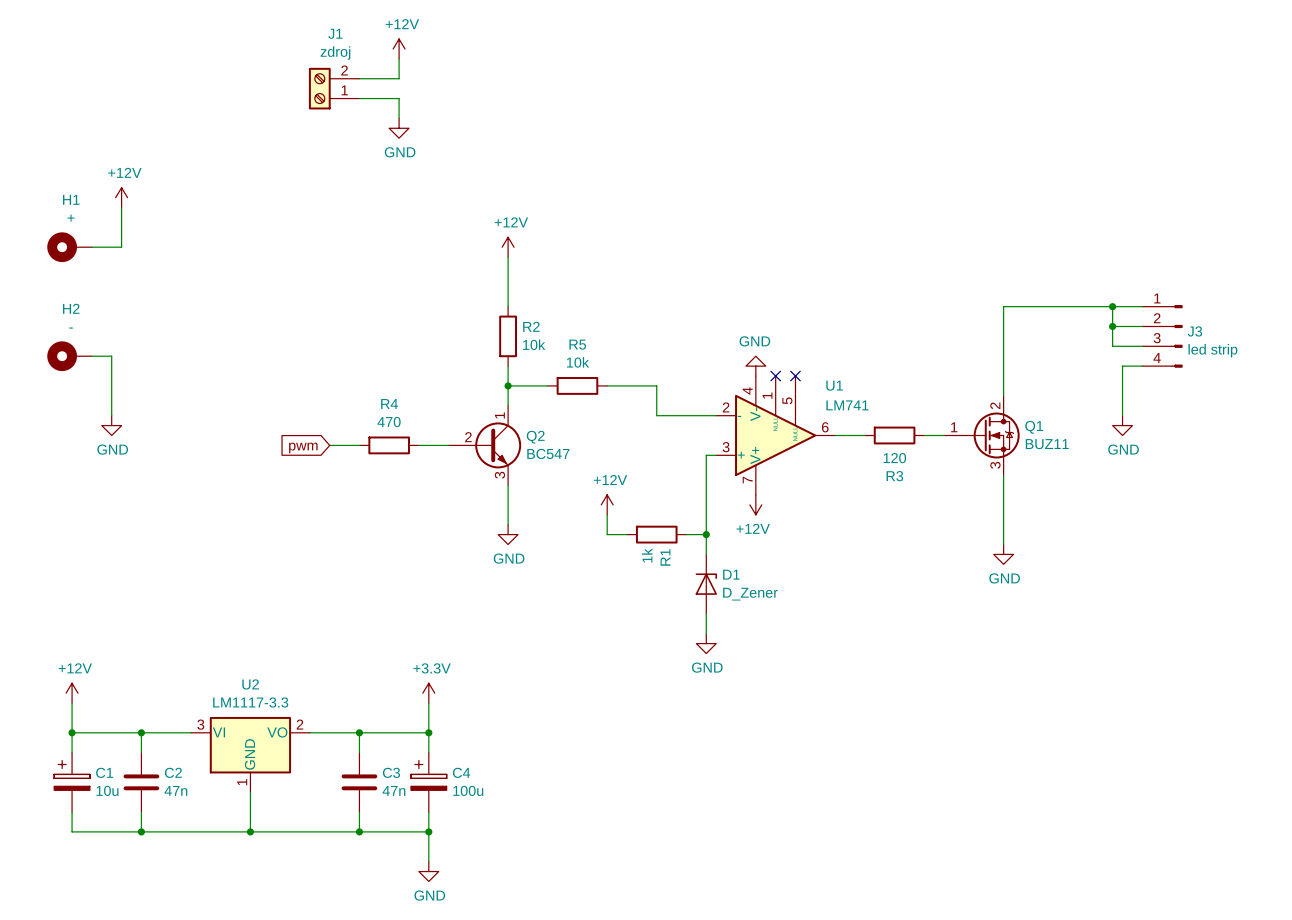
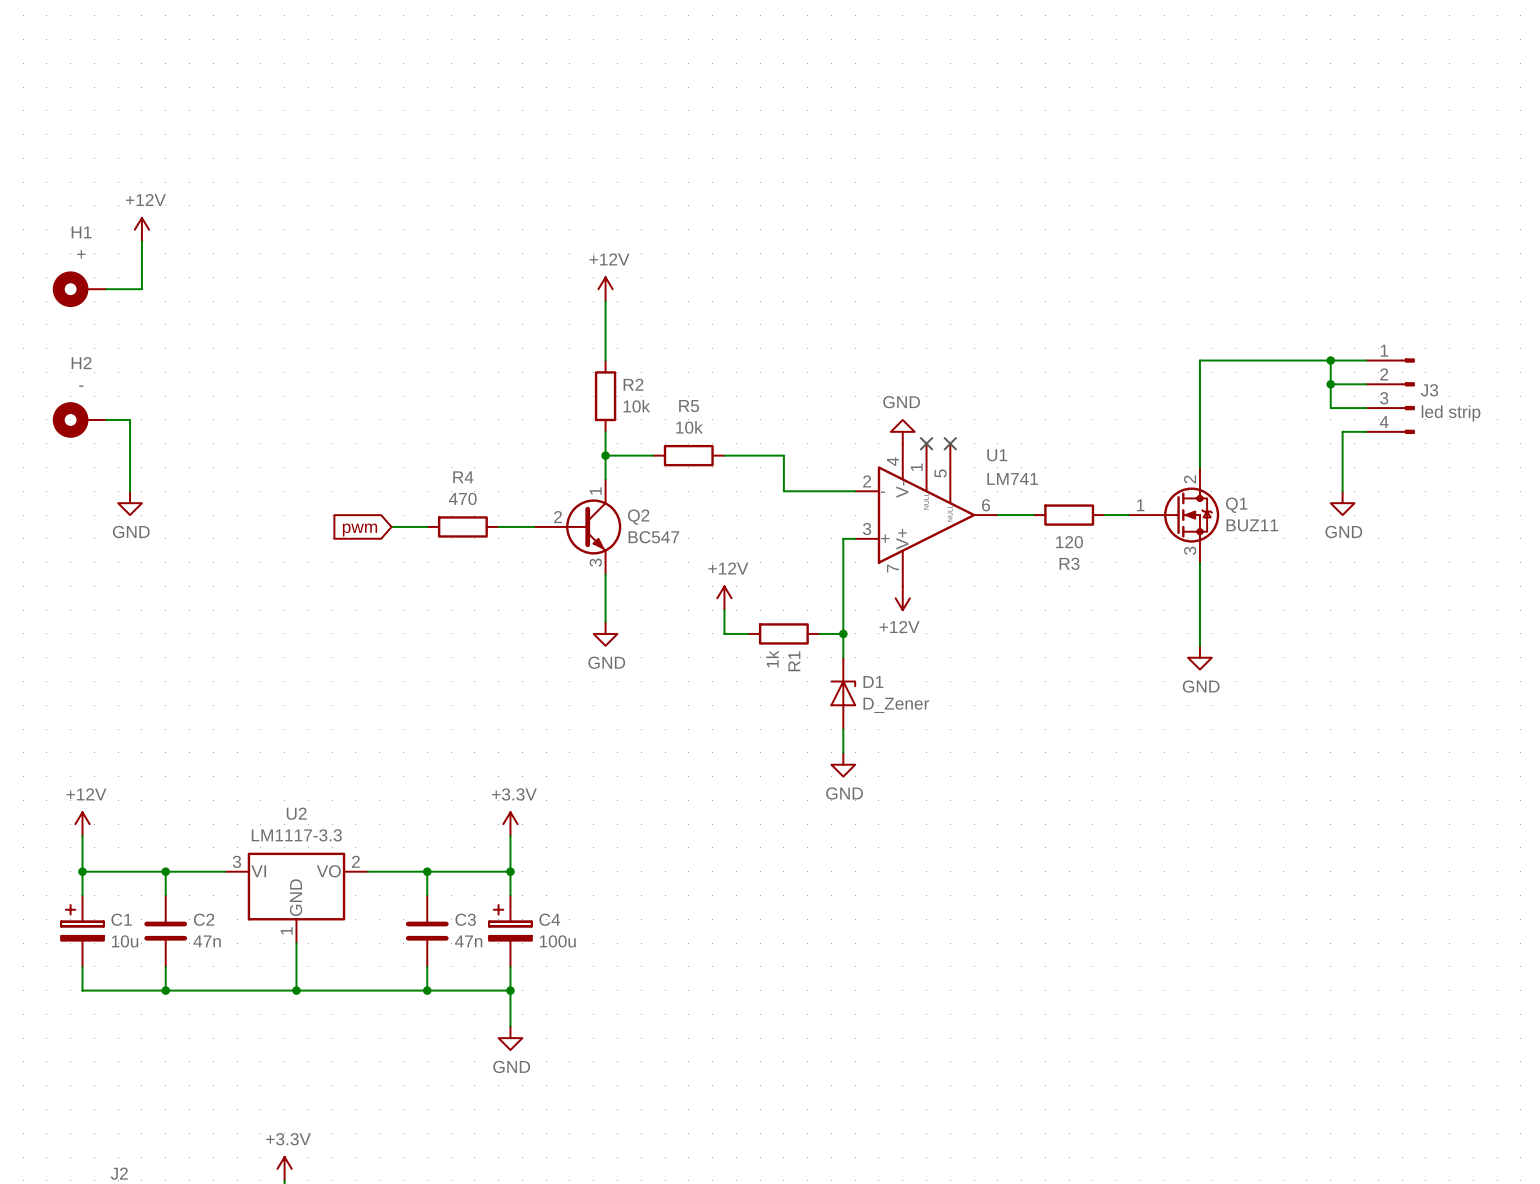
power symbol: +12V (399, 49) -> none
wire: (399, 58) (399, 78) (359, 78) -> none
J1: zdroj (334, 88) -> none
wire: (359, 98) (399, 98) (399, 118) -> none
power symbol: GND (399, 128) -> none

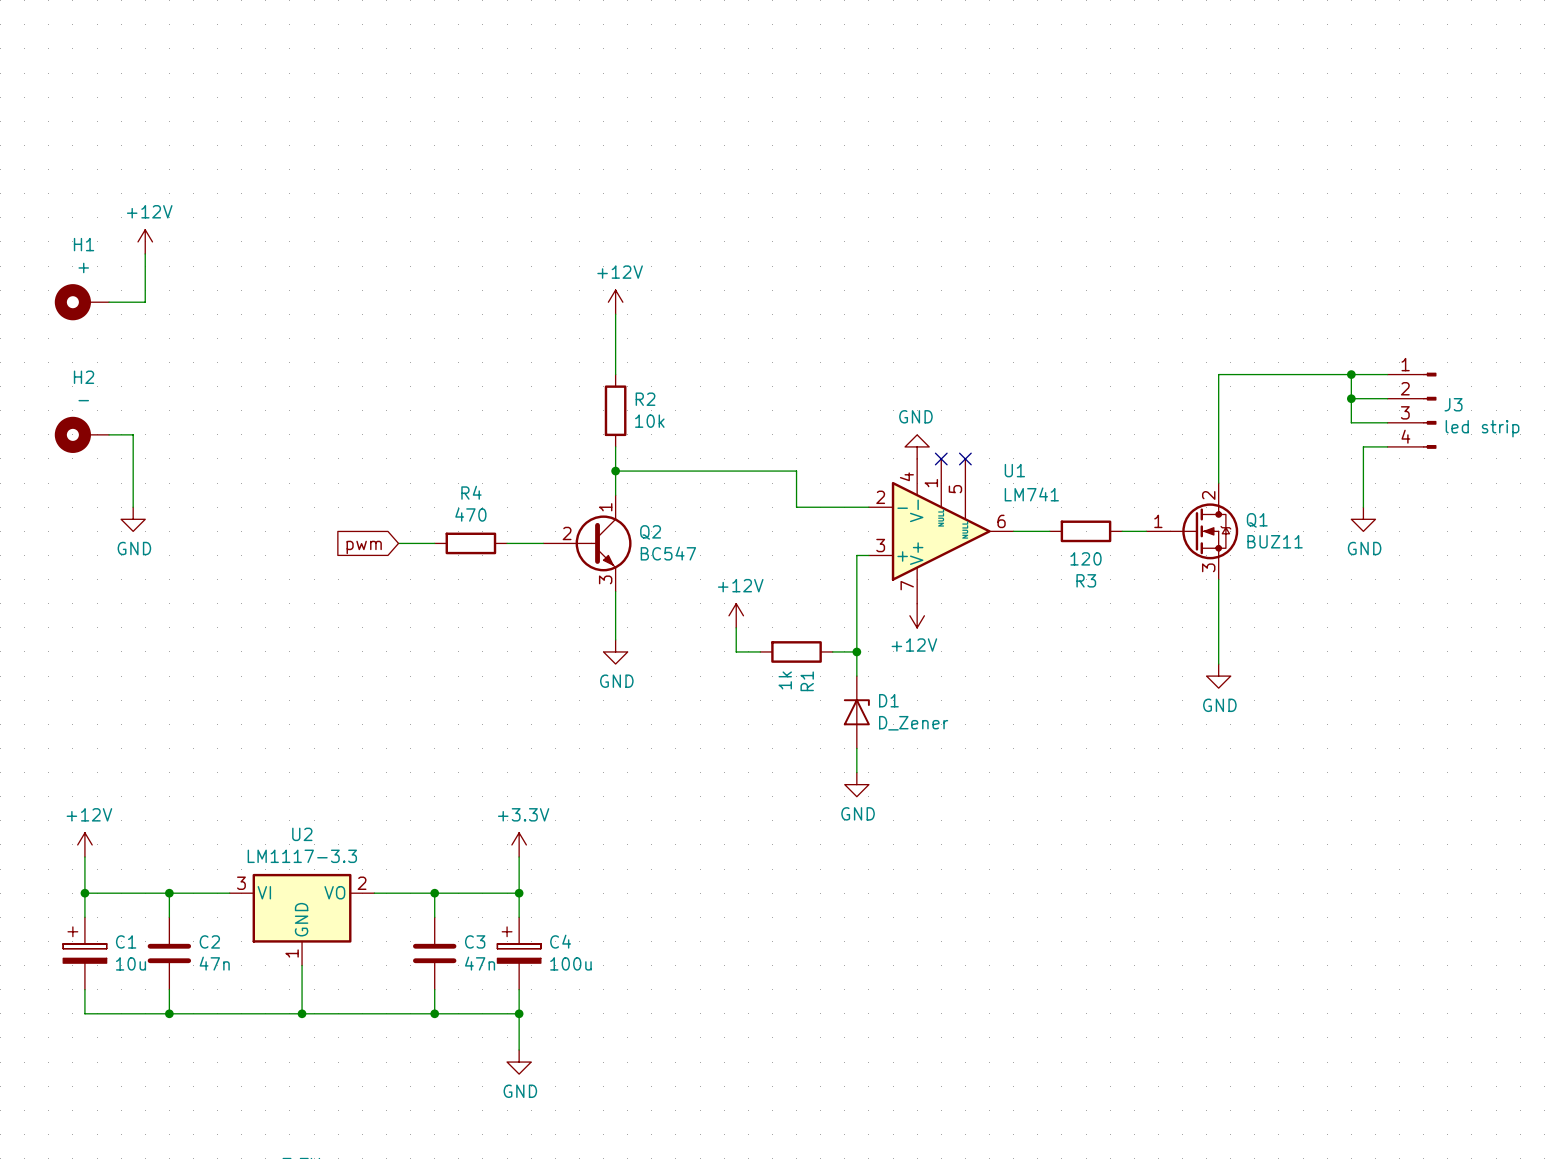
wire: none -> (663, 471) (736, 471)
R5: 10k (688, 455) -> none

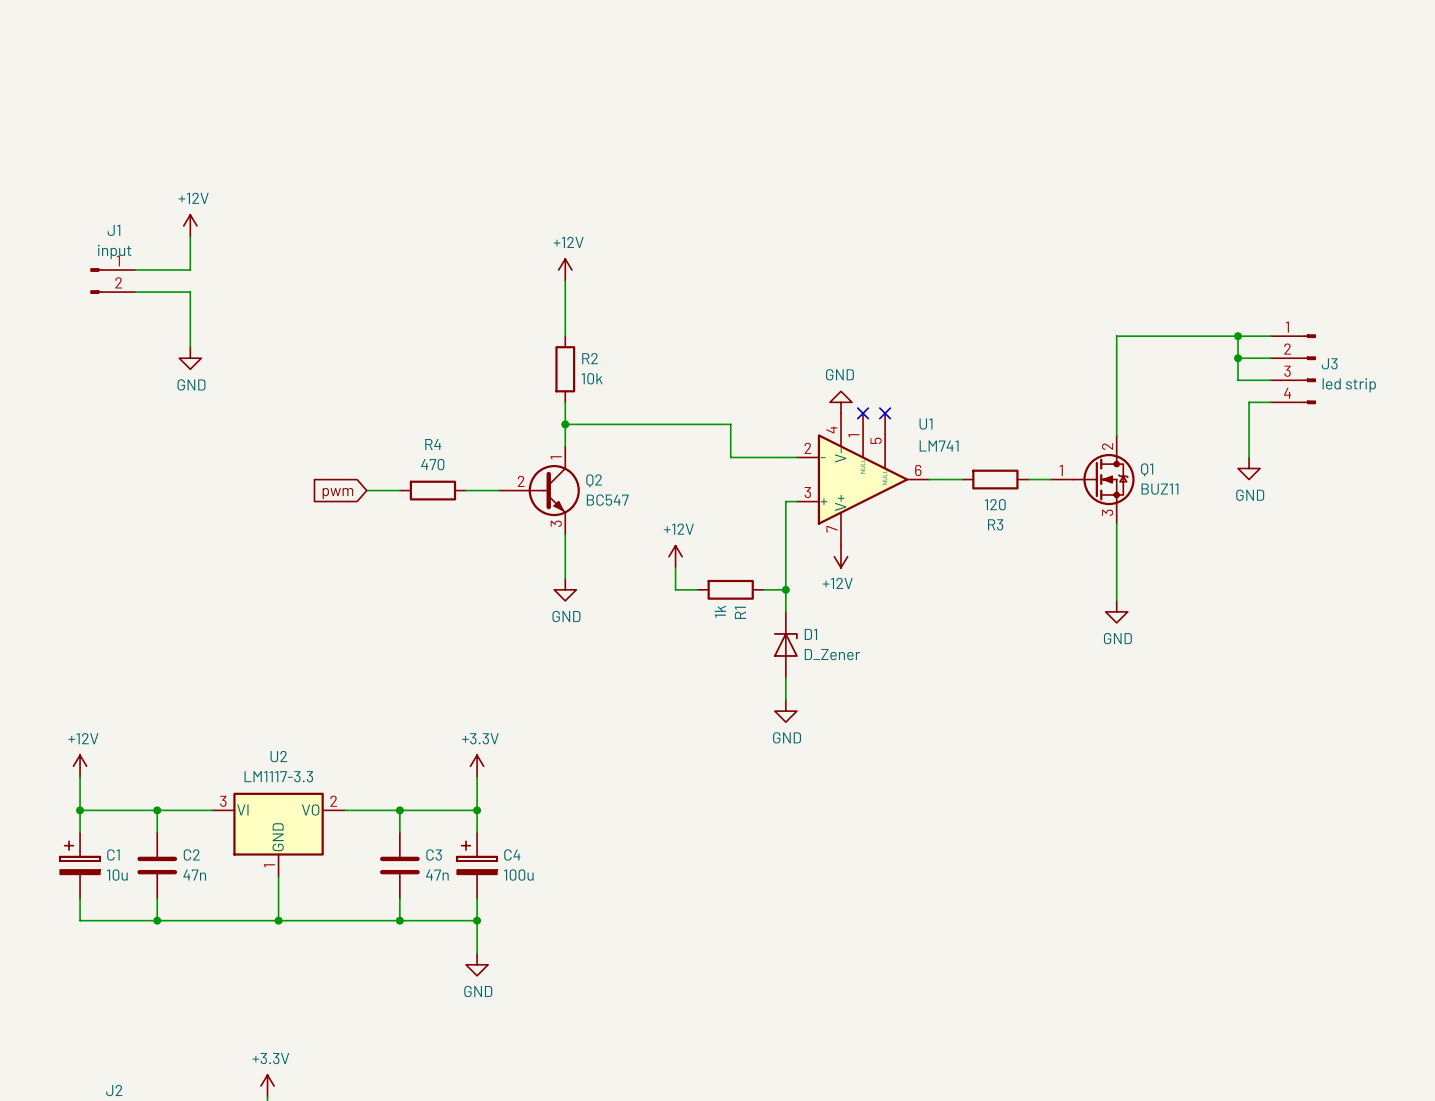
power symbol position: +12V (145, 241) -> +12V (190, 225)
wire: (145, 253) (145, 302) (109, 302) -> none
wire: none -> (190, 236) (190, 270) (135, 270)
H1: + (81, 302) -> none
J1: none -> input (112, 281)
wire: none -> (135, 292) (190, 292) (190, 347)
H2: - (81, 434) -> none
wire: (109, 434) (133, 434) (133, 507) -> none
power symbol position: GND (133, 519) -> GND (190, 358)

